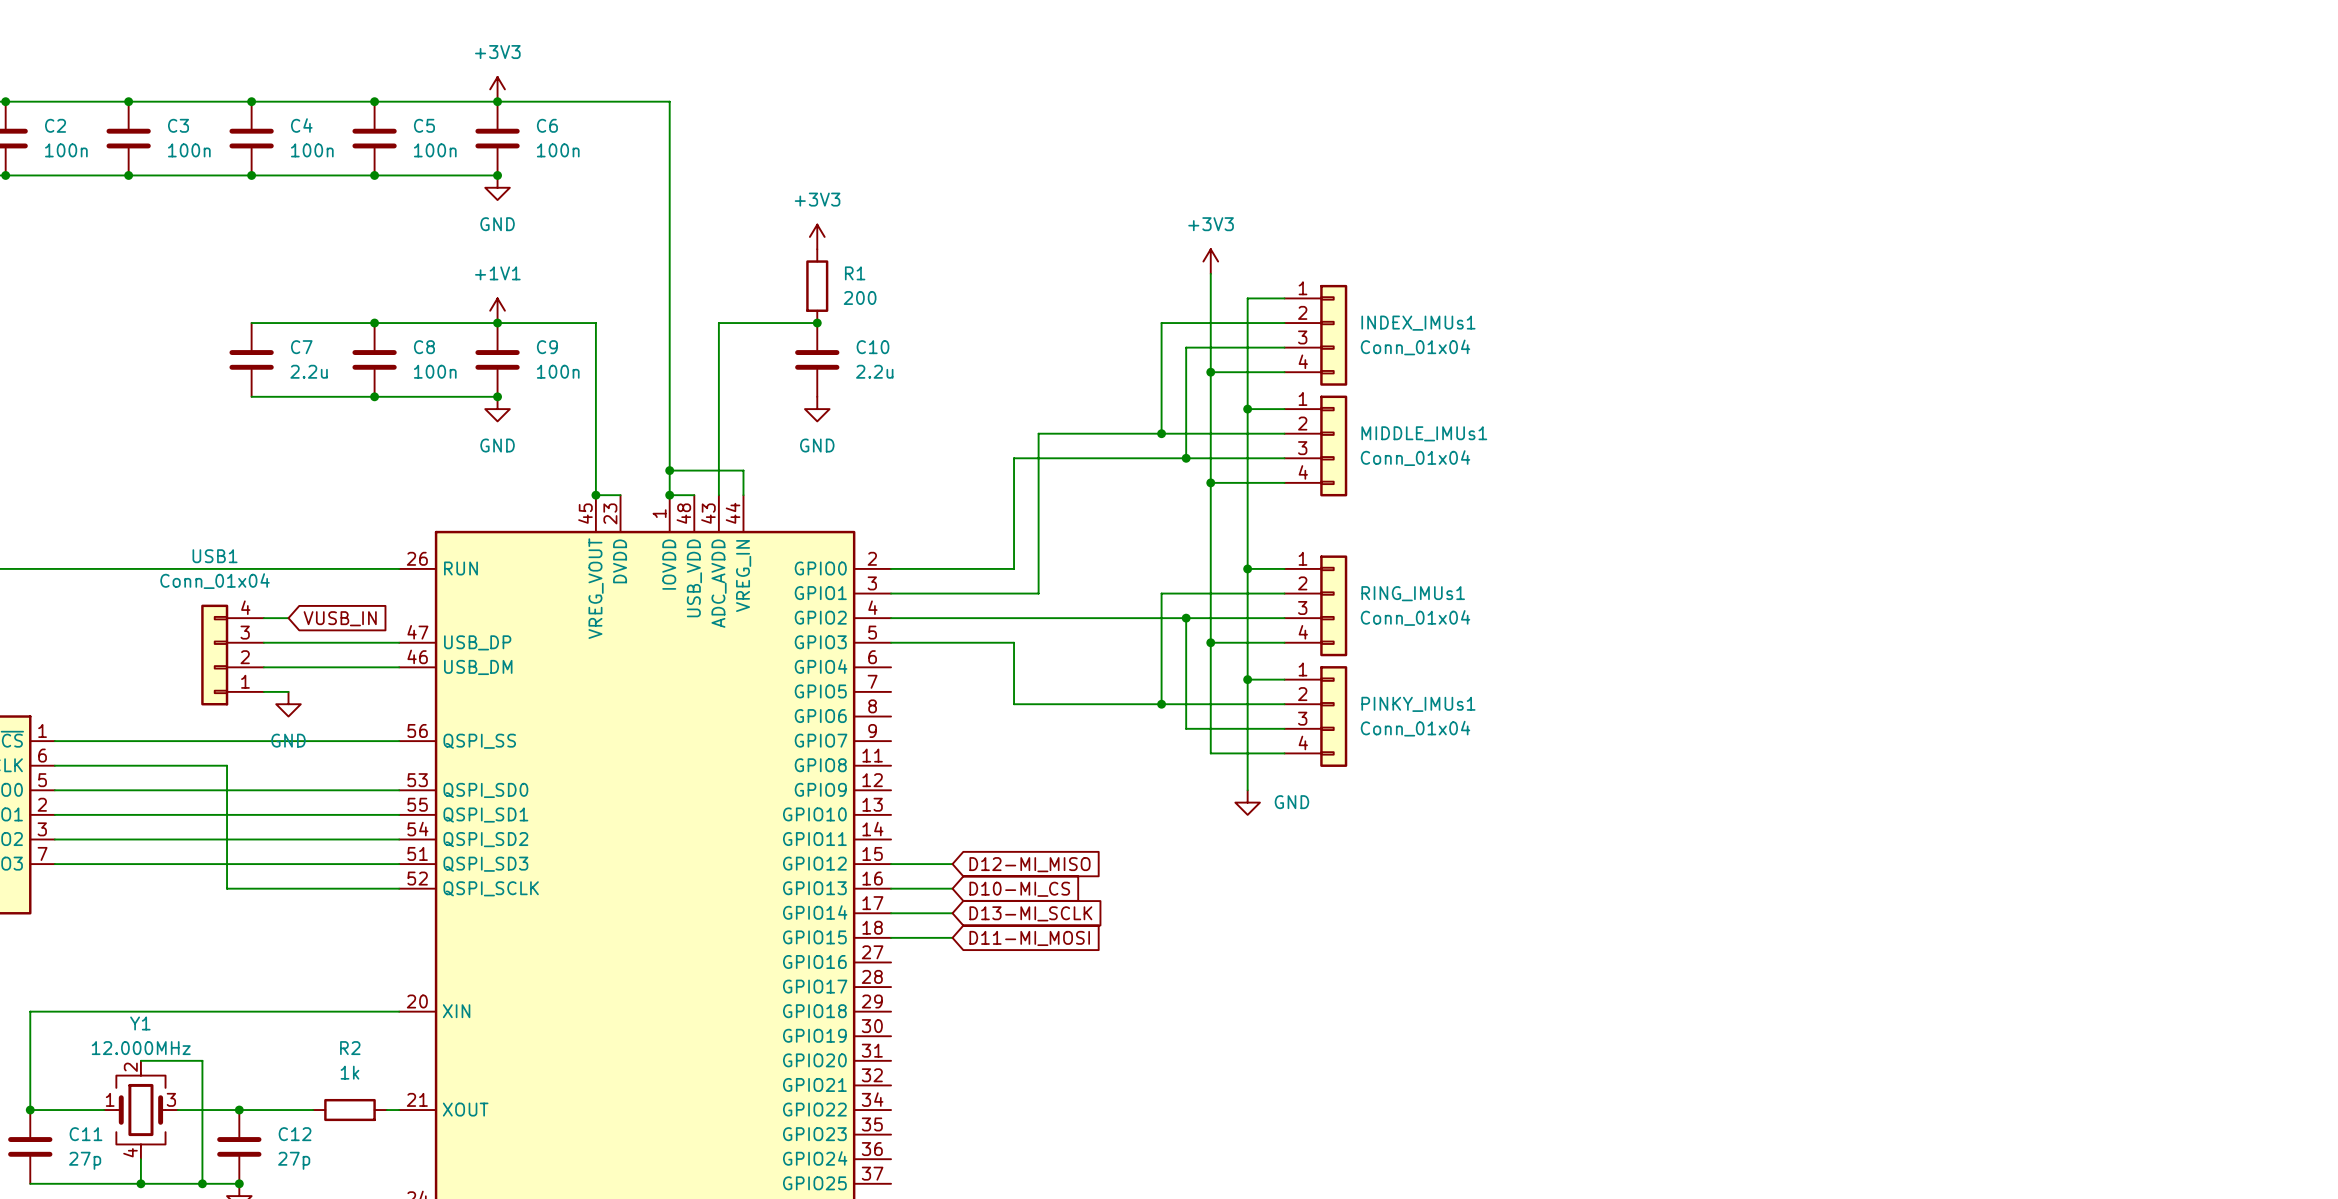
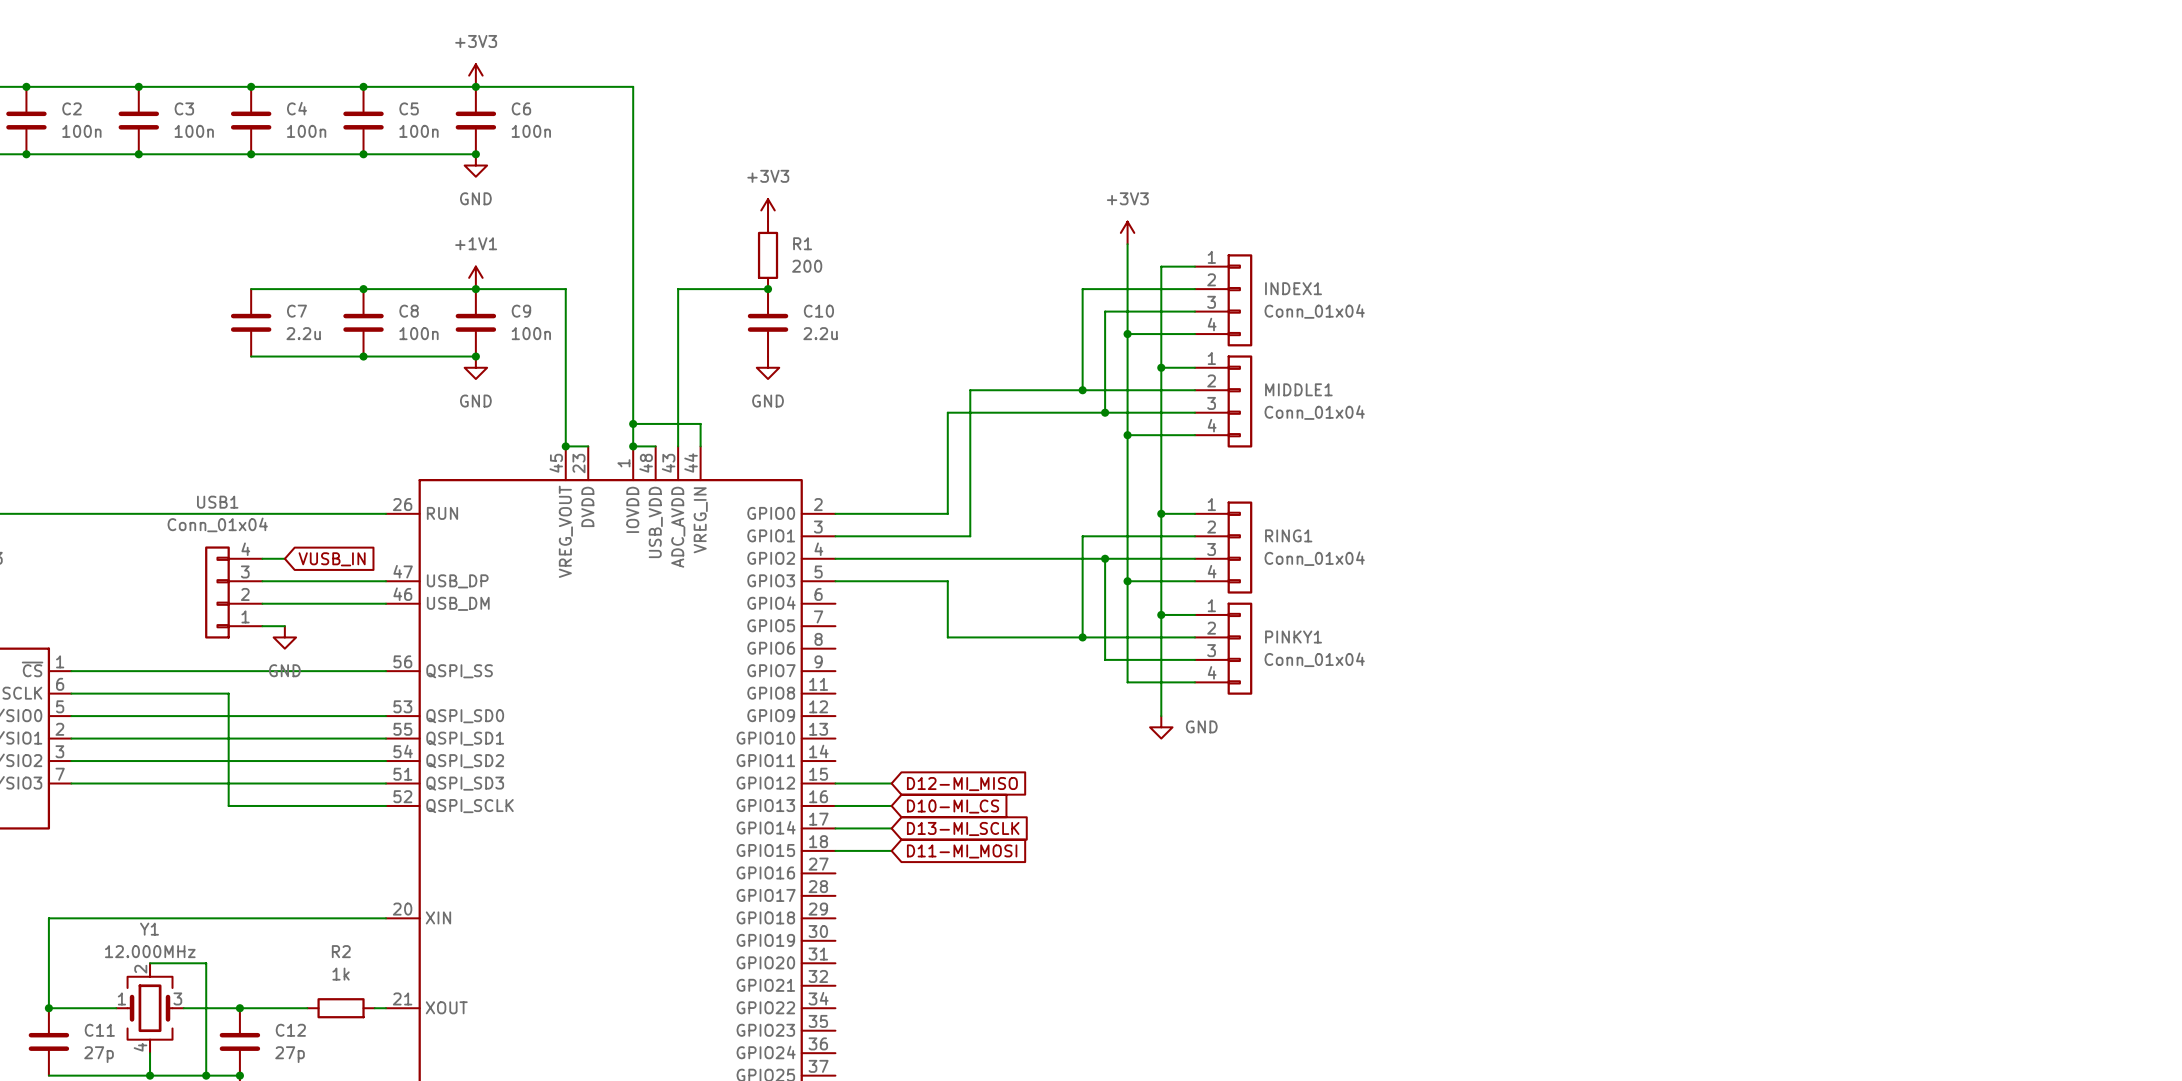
INDEX_IMUs1 name: INDEX_IMUs1 (1418, 323) -> INDEX1 (1293, 288)
MIDDLE_IMUs1 name: MIDDLE_IMUs1 (1424, 433) -> MIDDLE1 (1298, 389)
RING_IMUs1 name: RING_IMUs1 (1413, 593) -> RING1 (1288, 535)
PINKY_IMUs1 name: PINKY_IMUs1 (1418, 704) -> PINKY1 (1293, 637)

